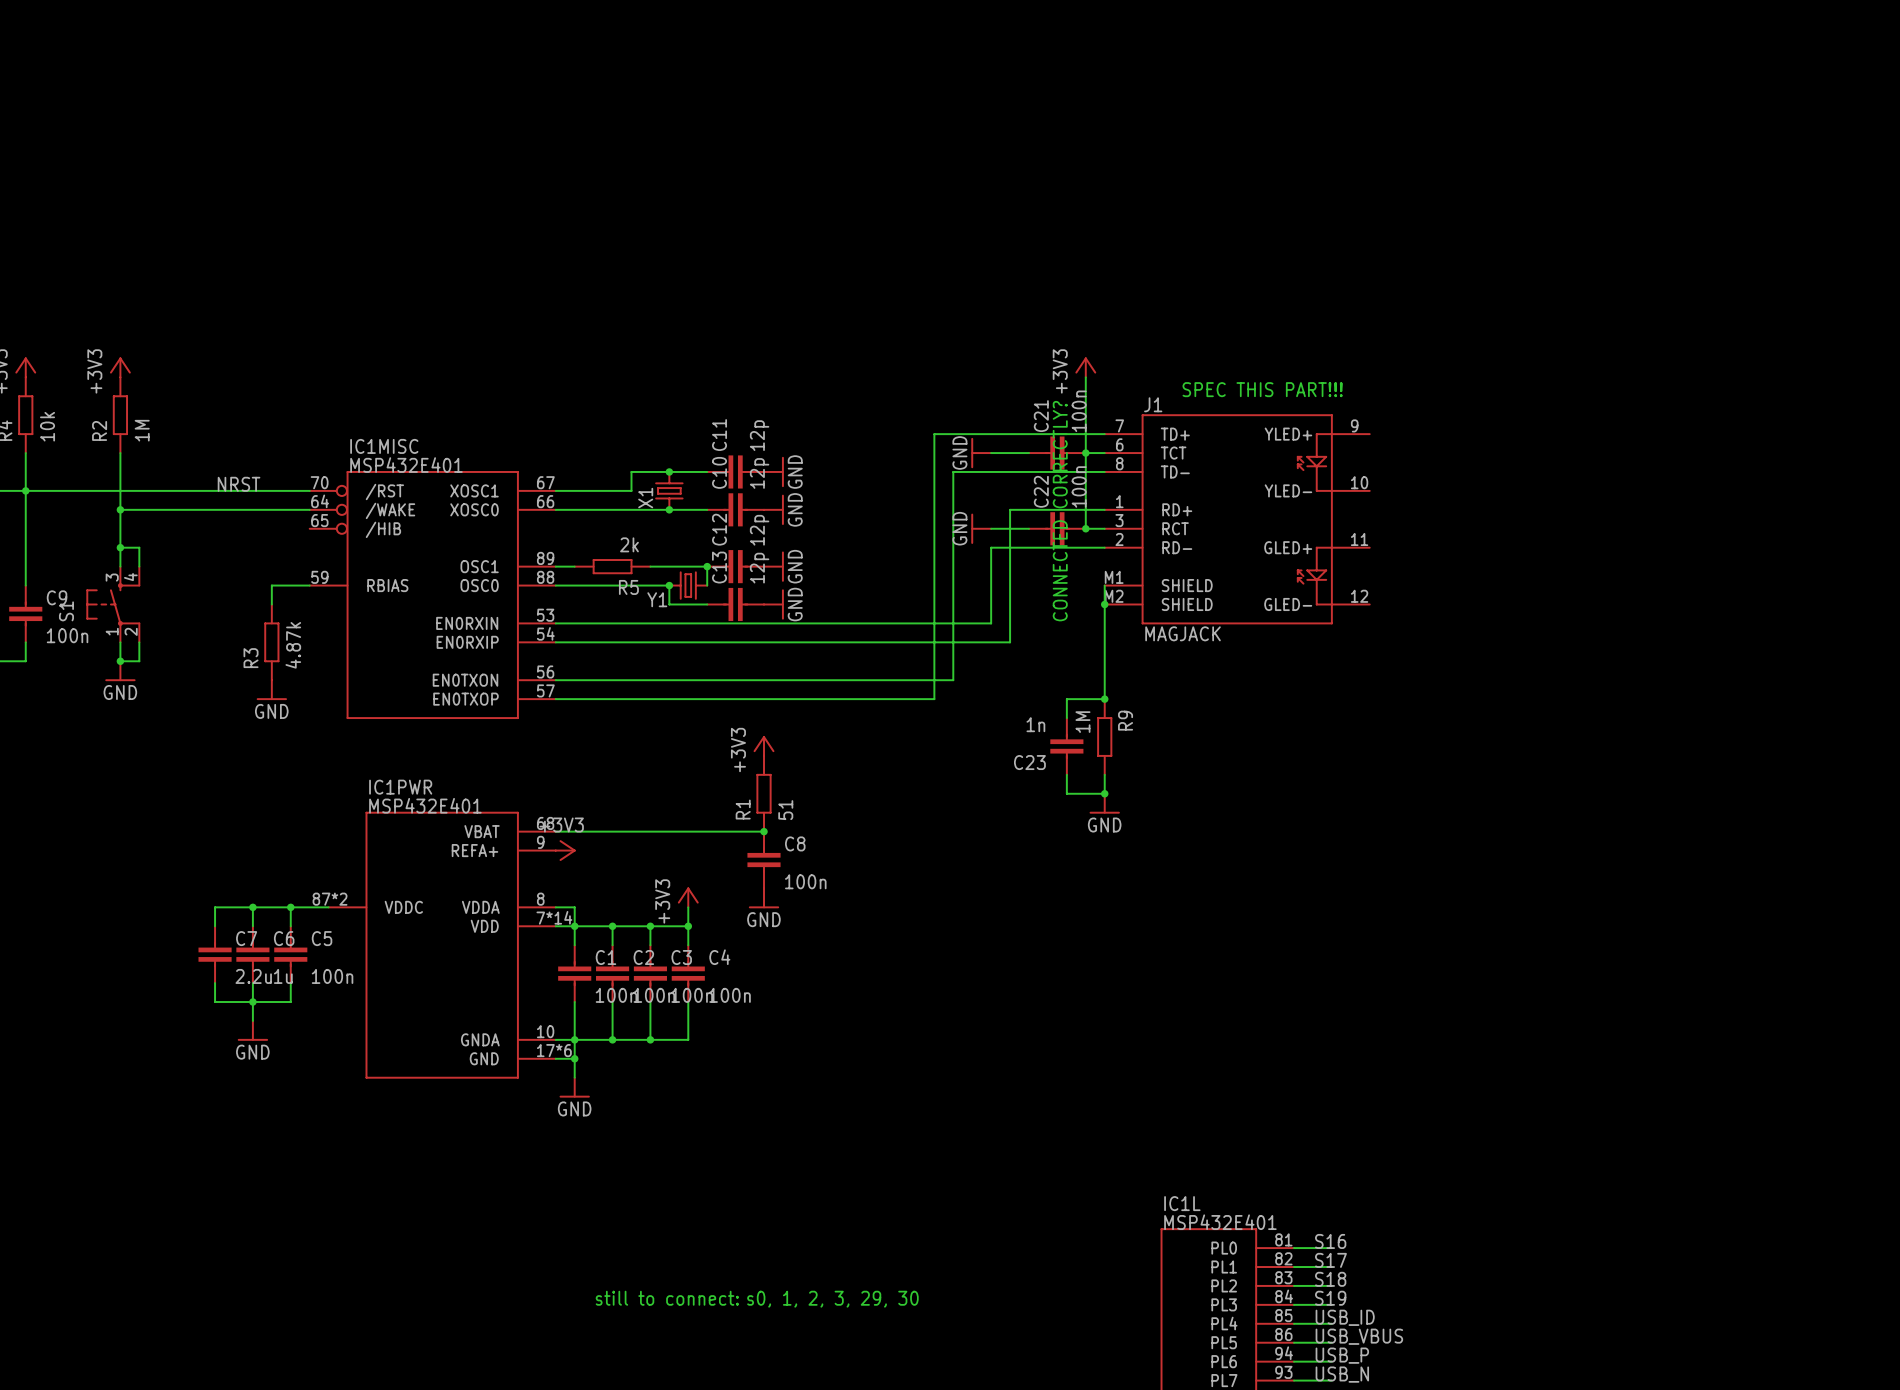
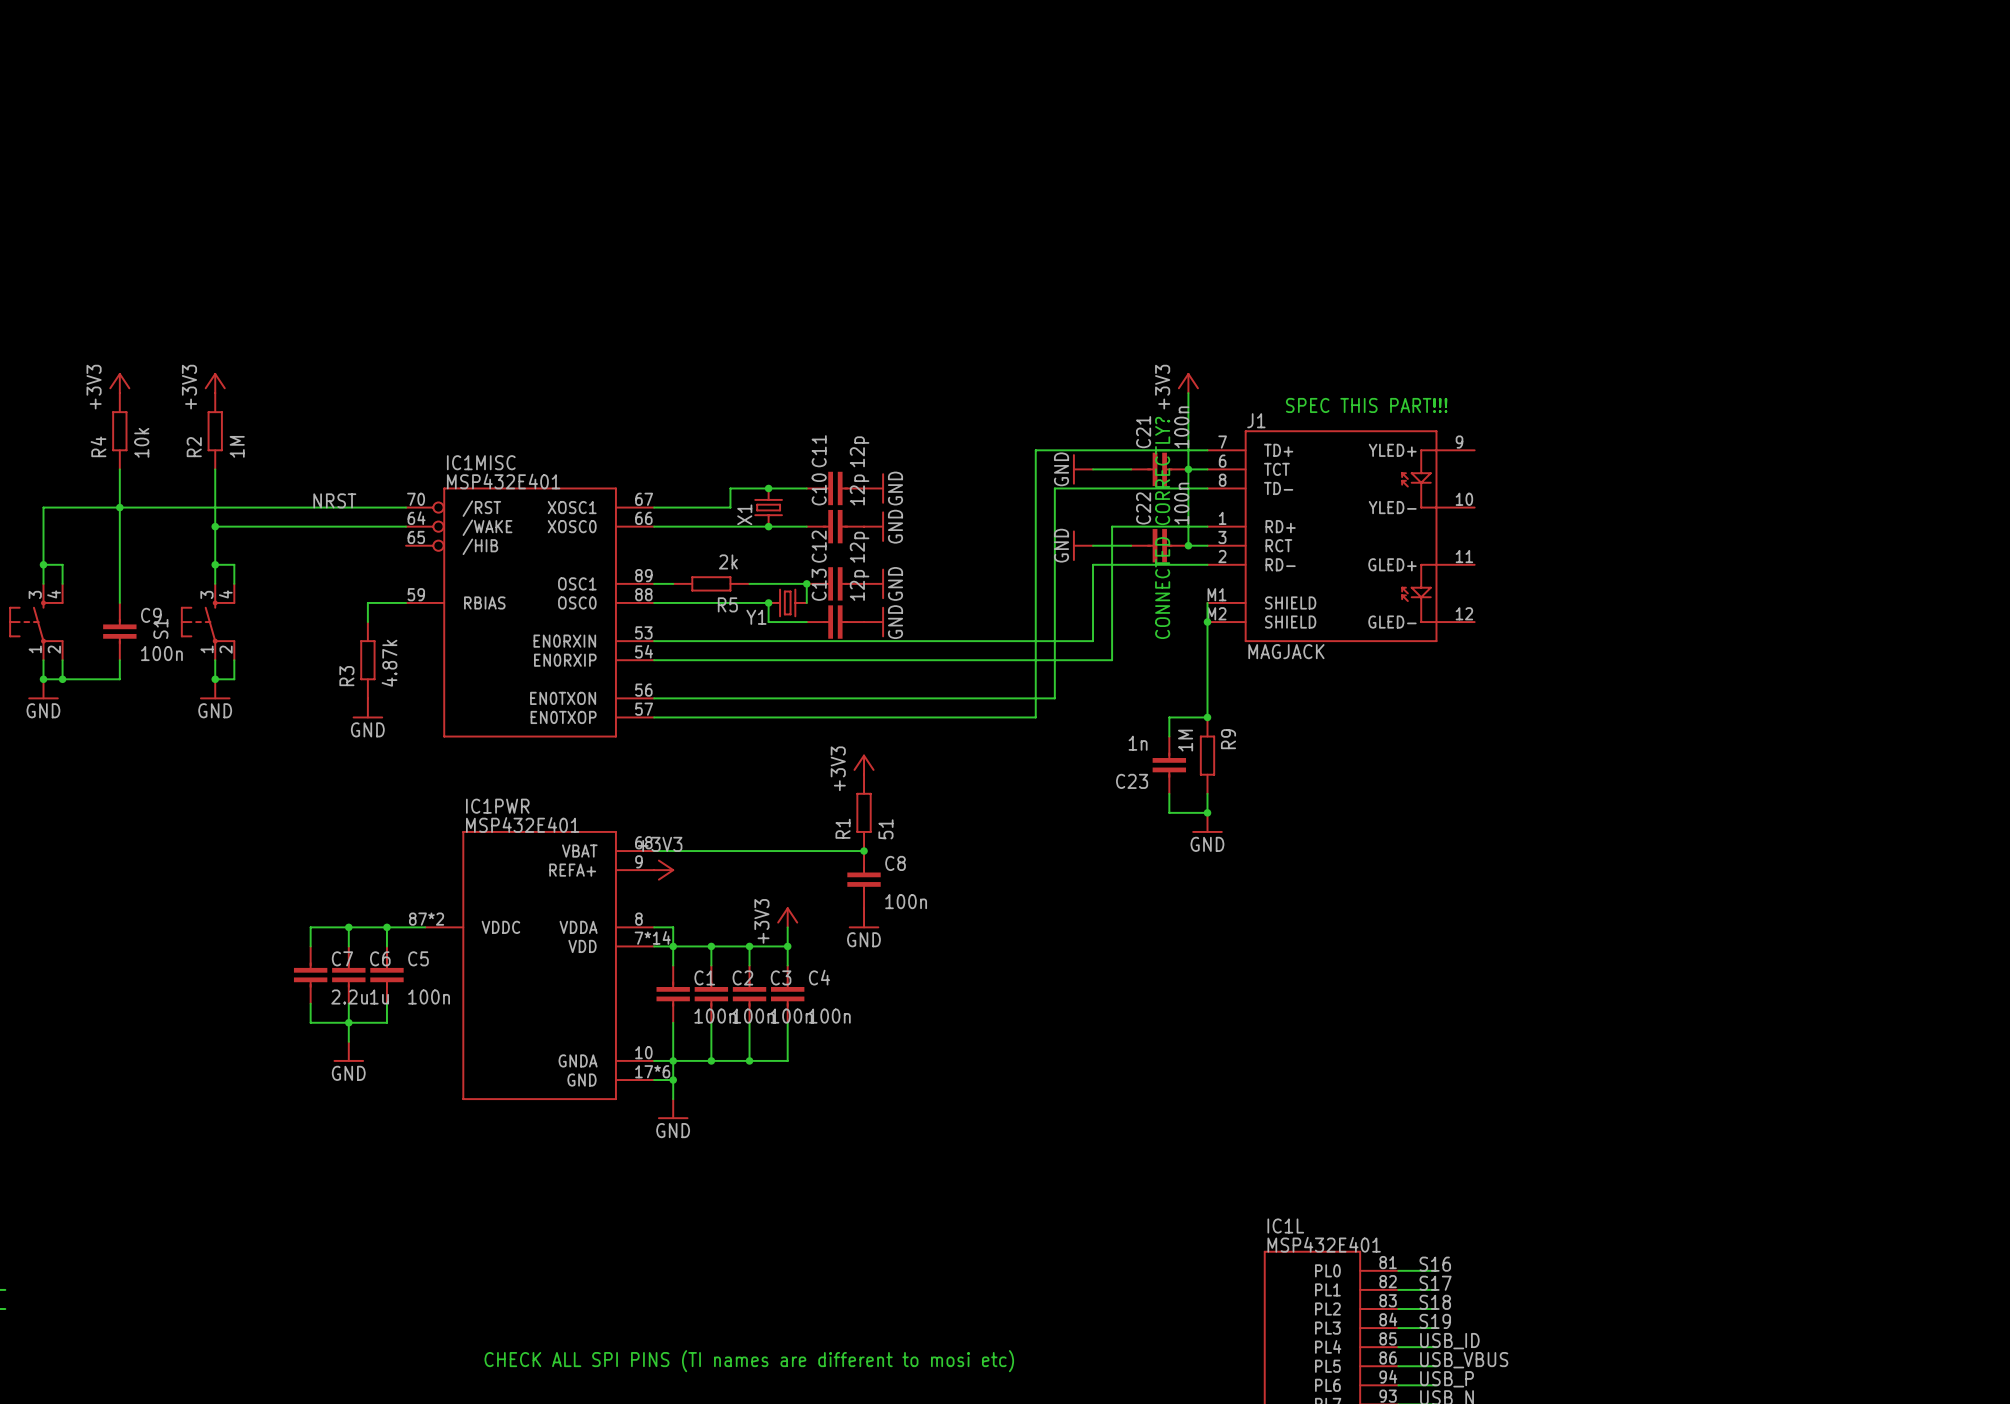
text: still to connect: (667, 1298) -> none
text: s0, 1, 2, 3, 29, 30 (832, 1299) -> none
text: none -> CHECK ALL SPI PINS (TI names are different to mosi etc) (749, 1361)

